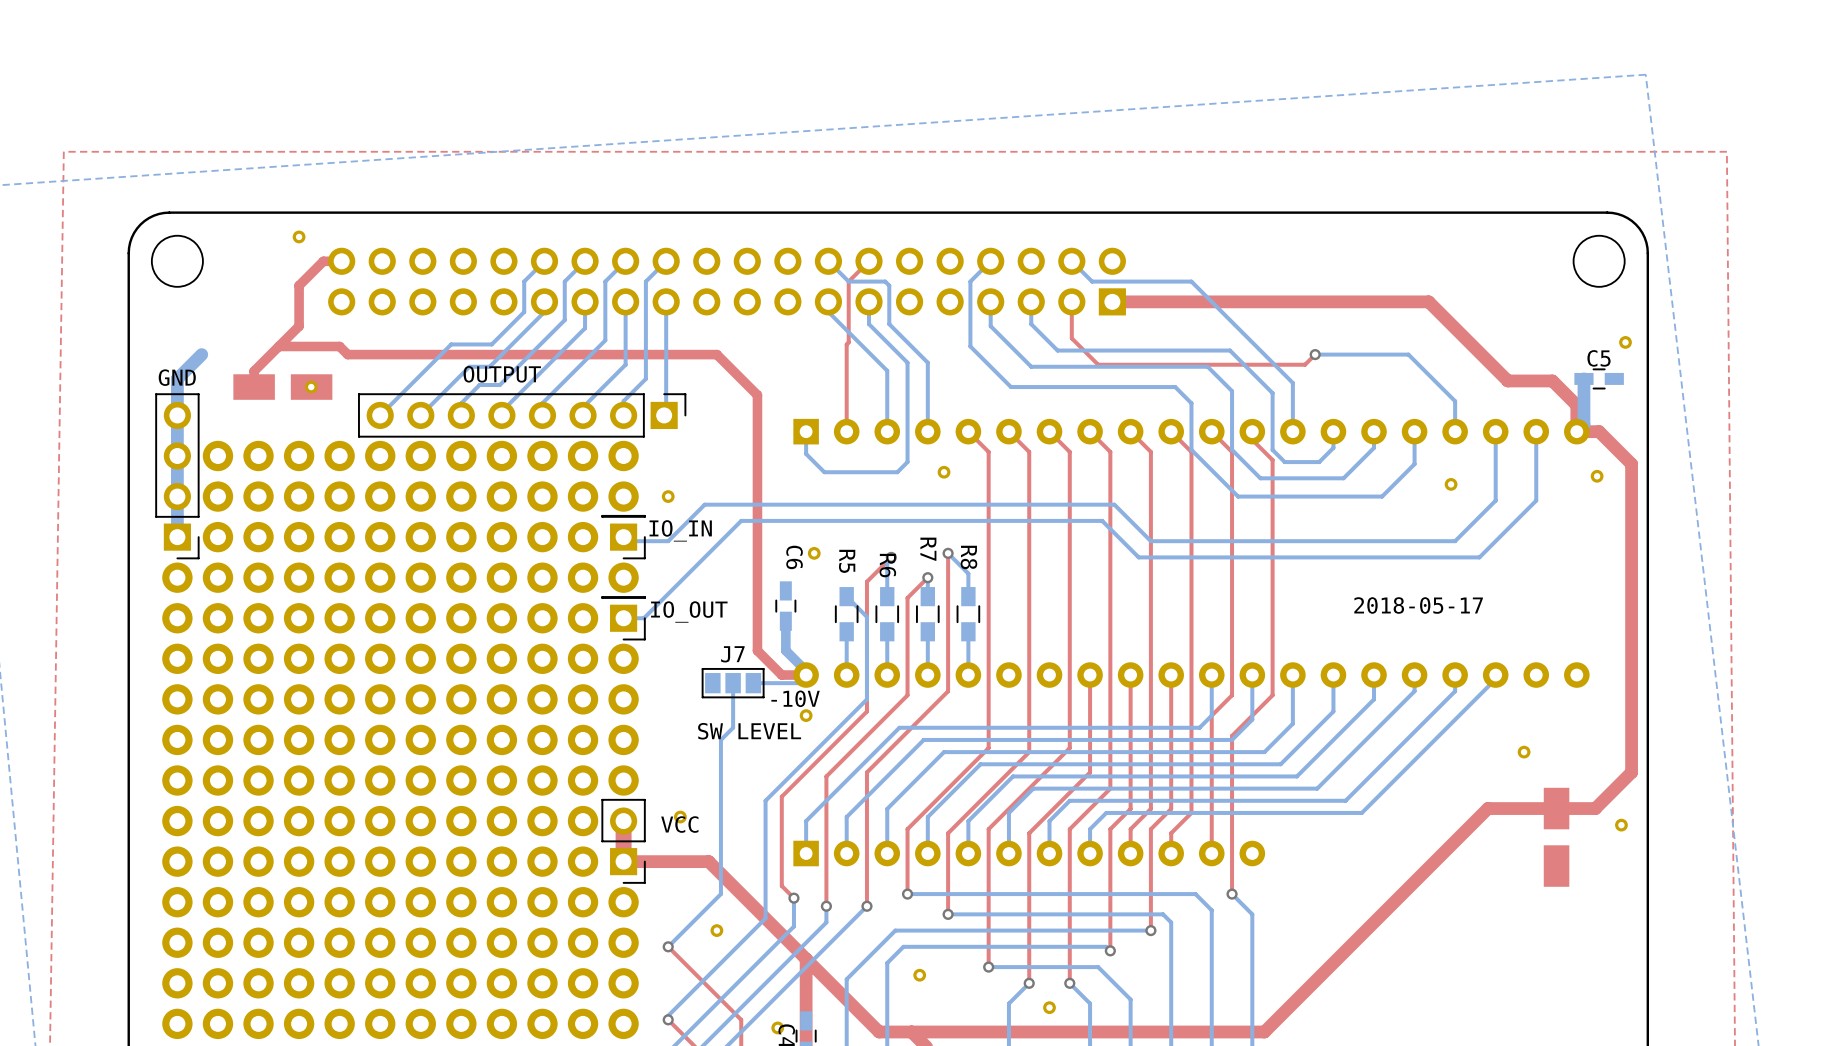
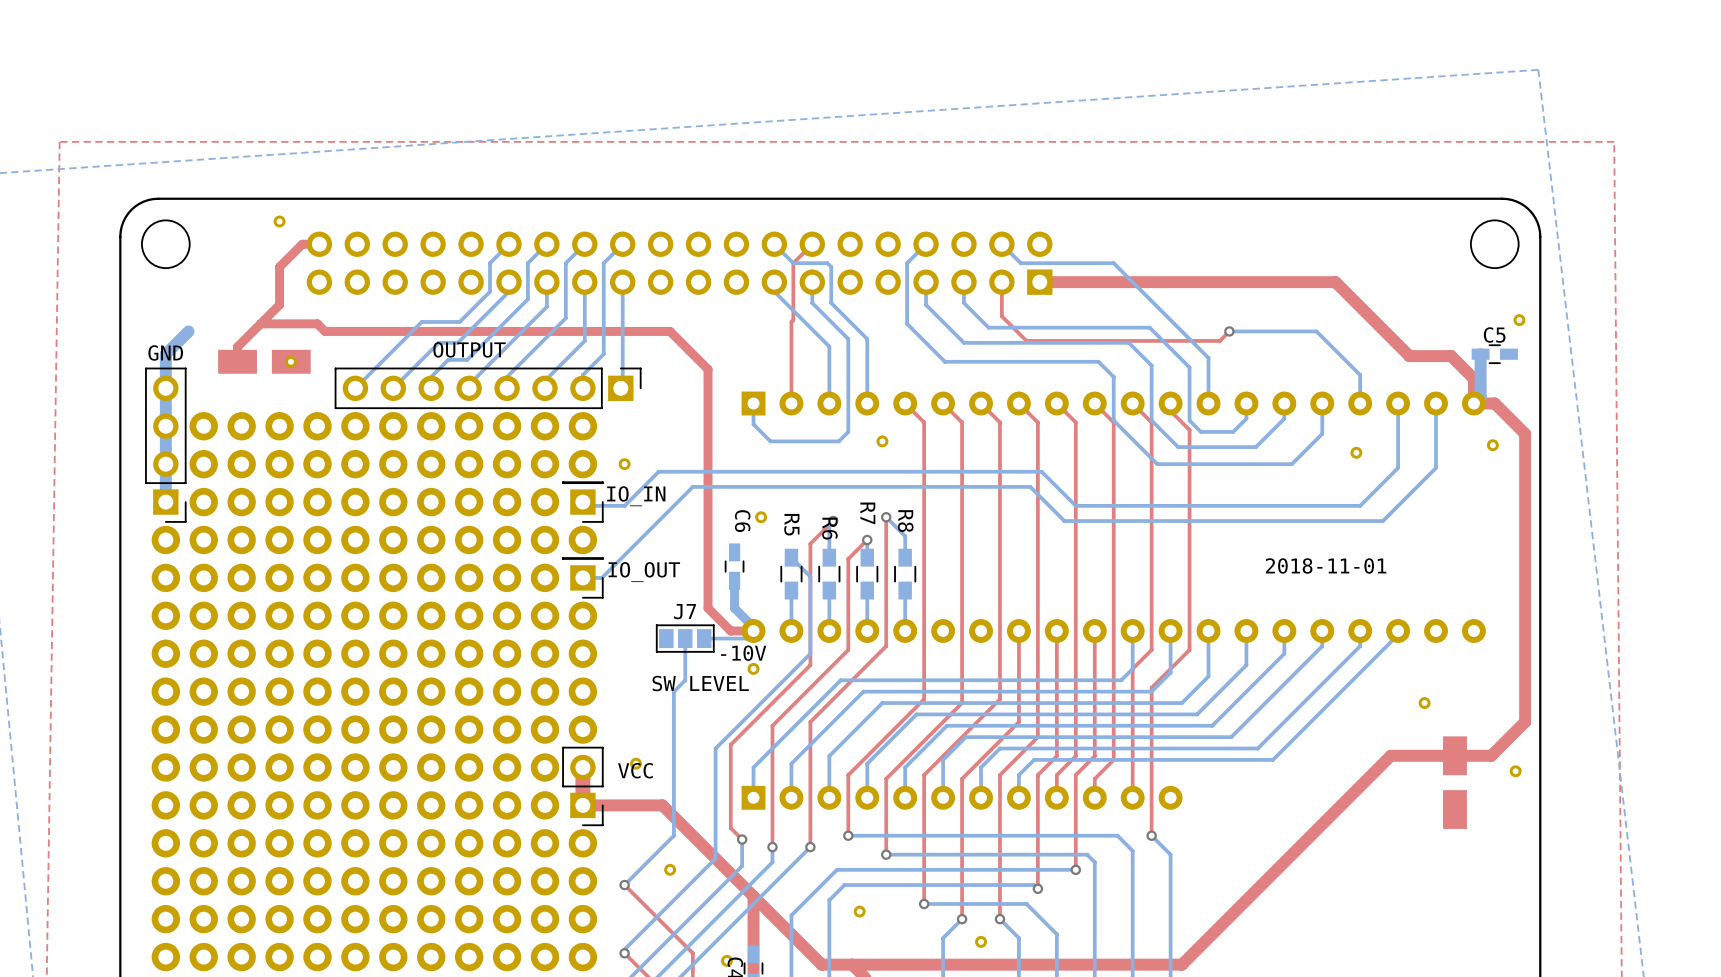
text: 2018-05-17 (1418, 605) -> 2018-11-01 (1326, 565)

